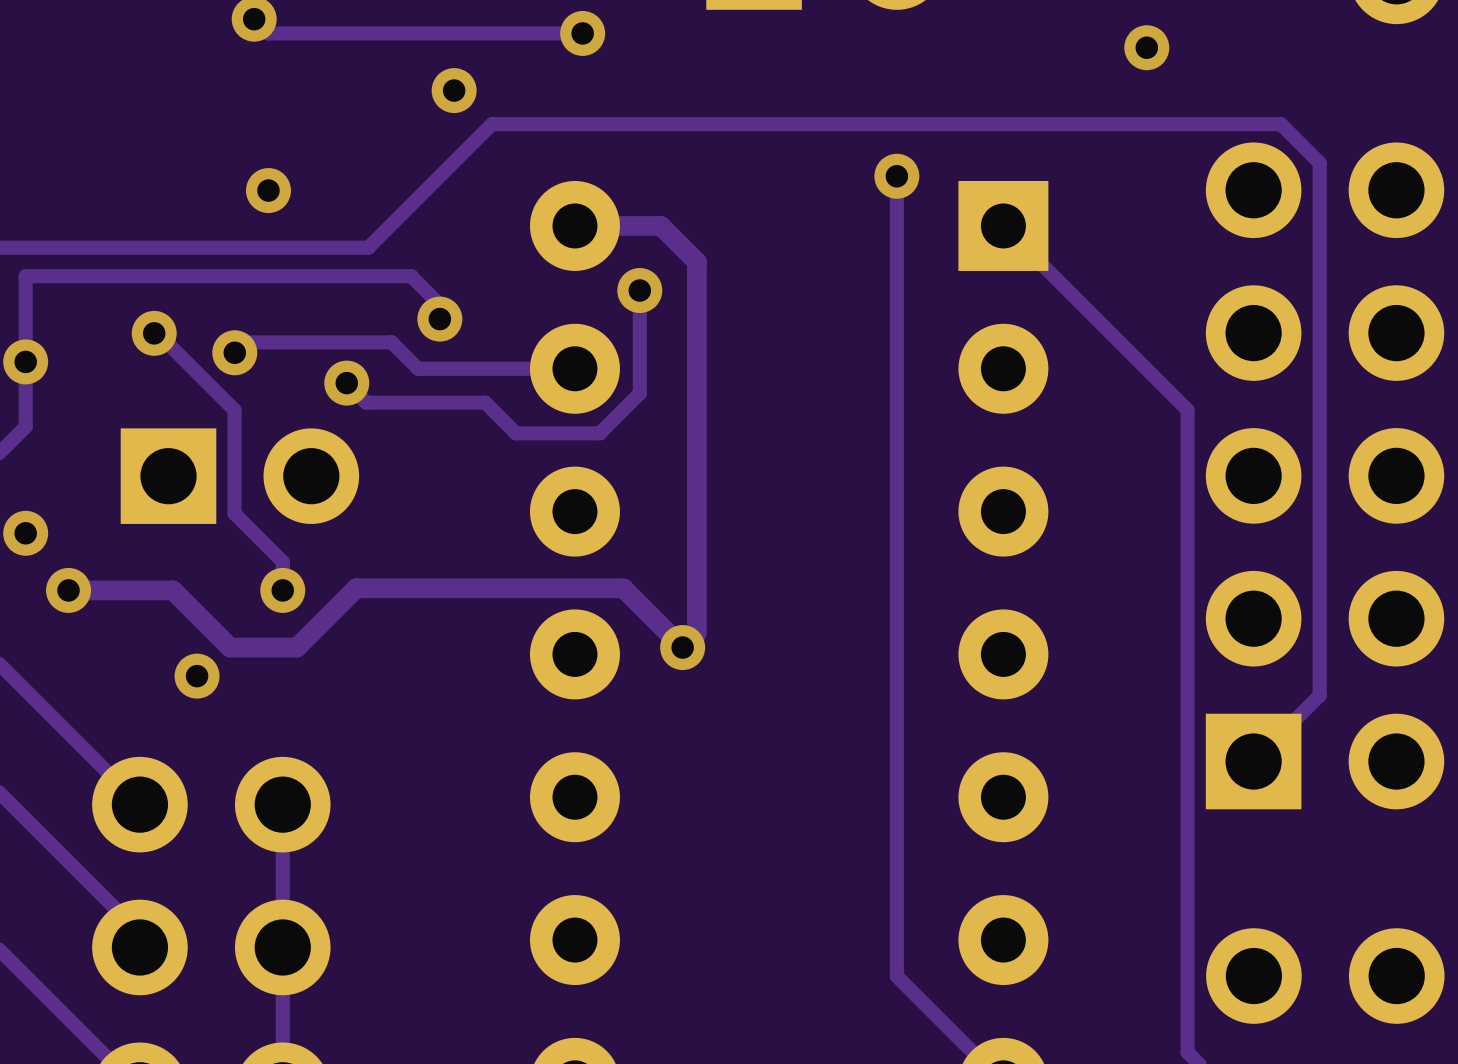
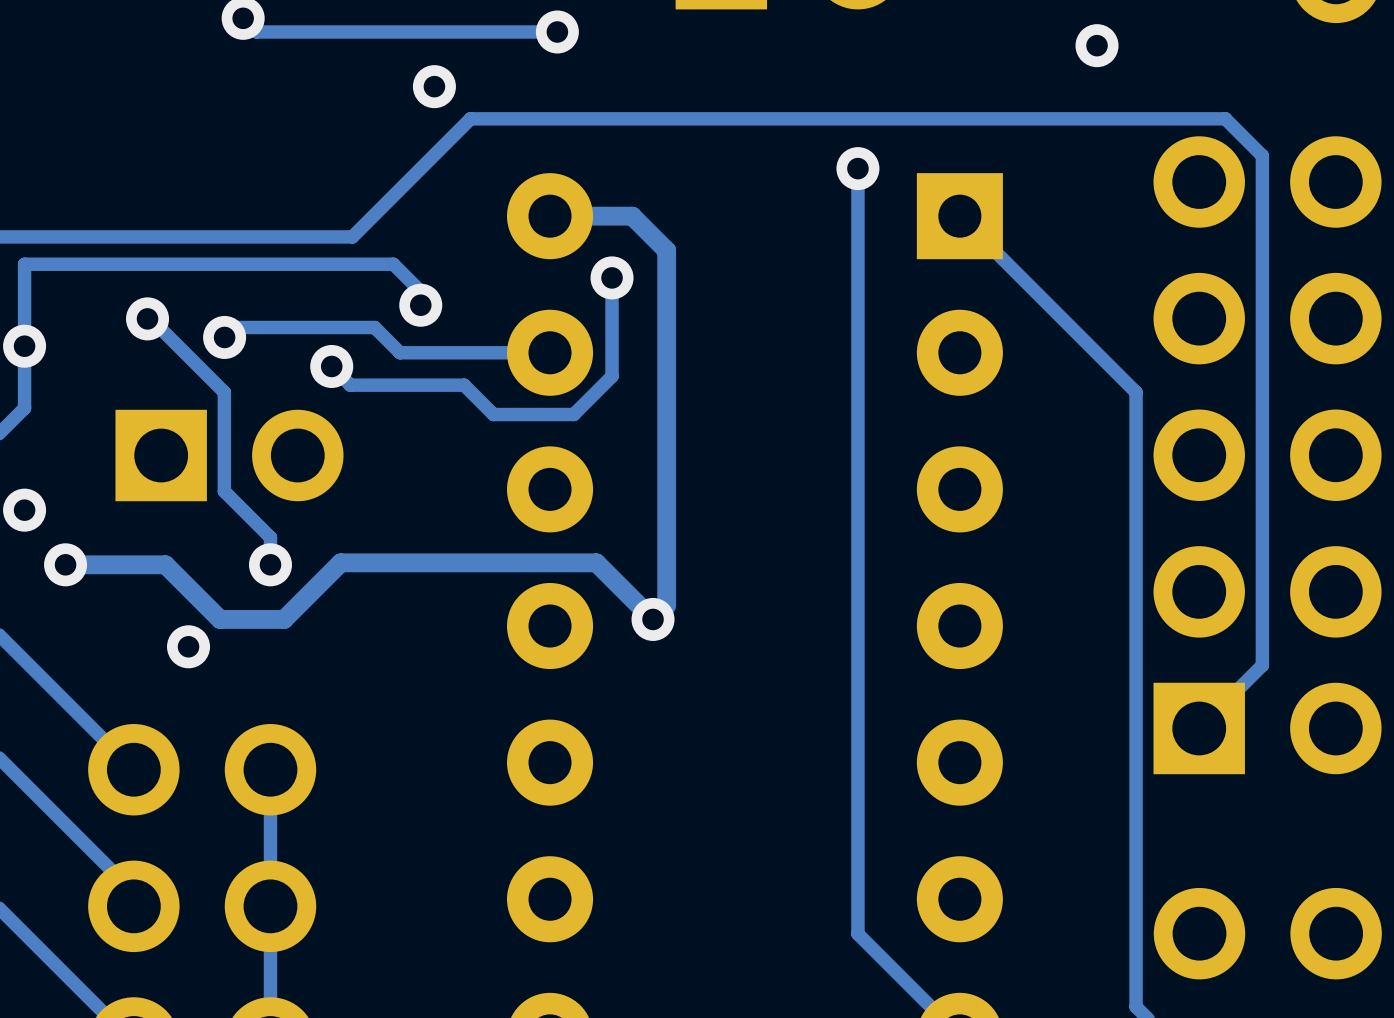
via: (268, 190) -> none

